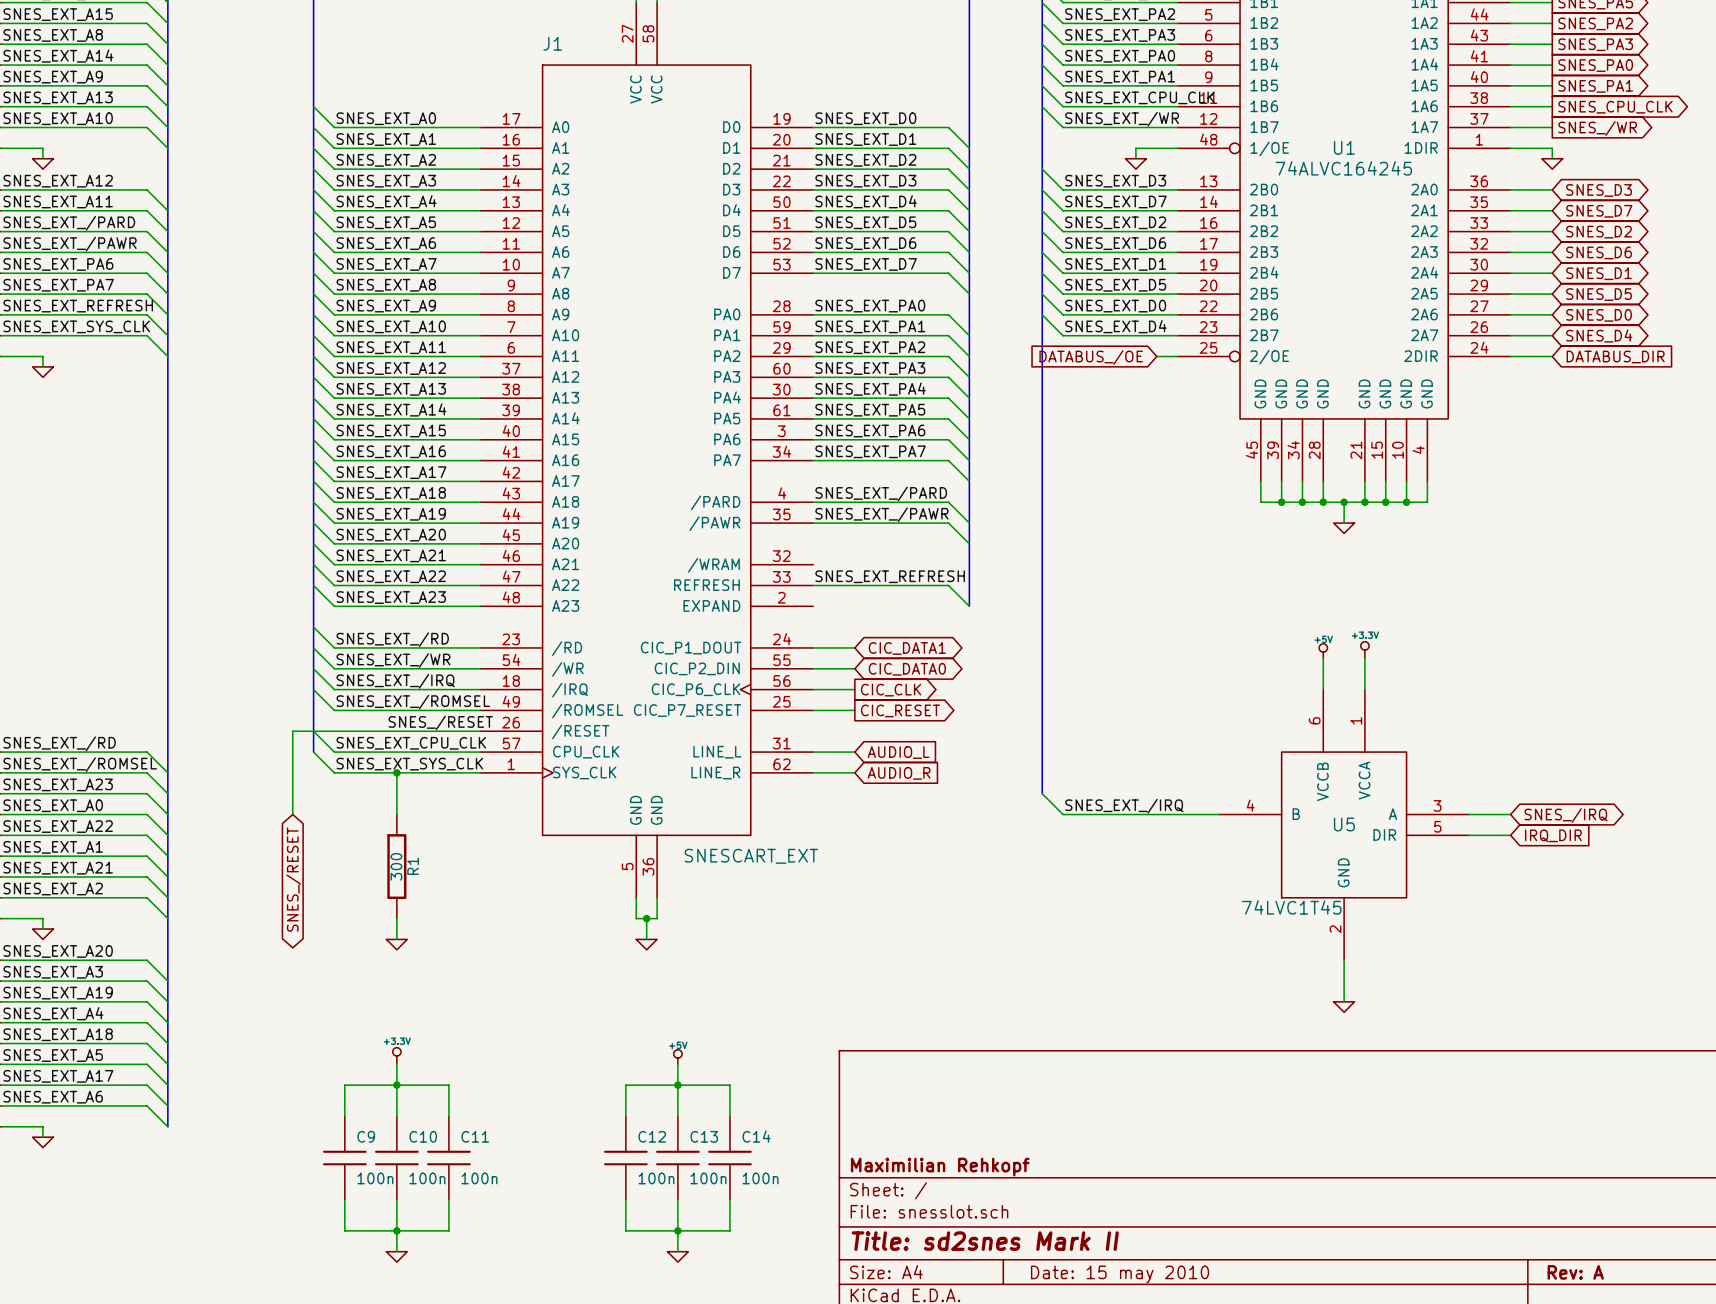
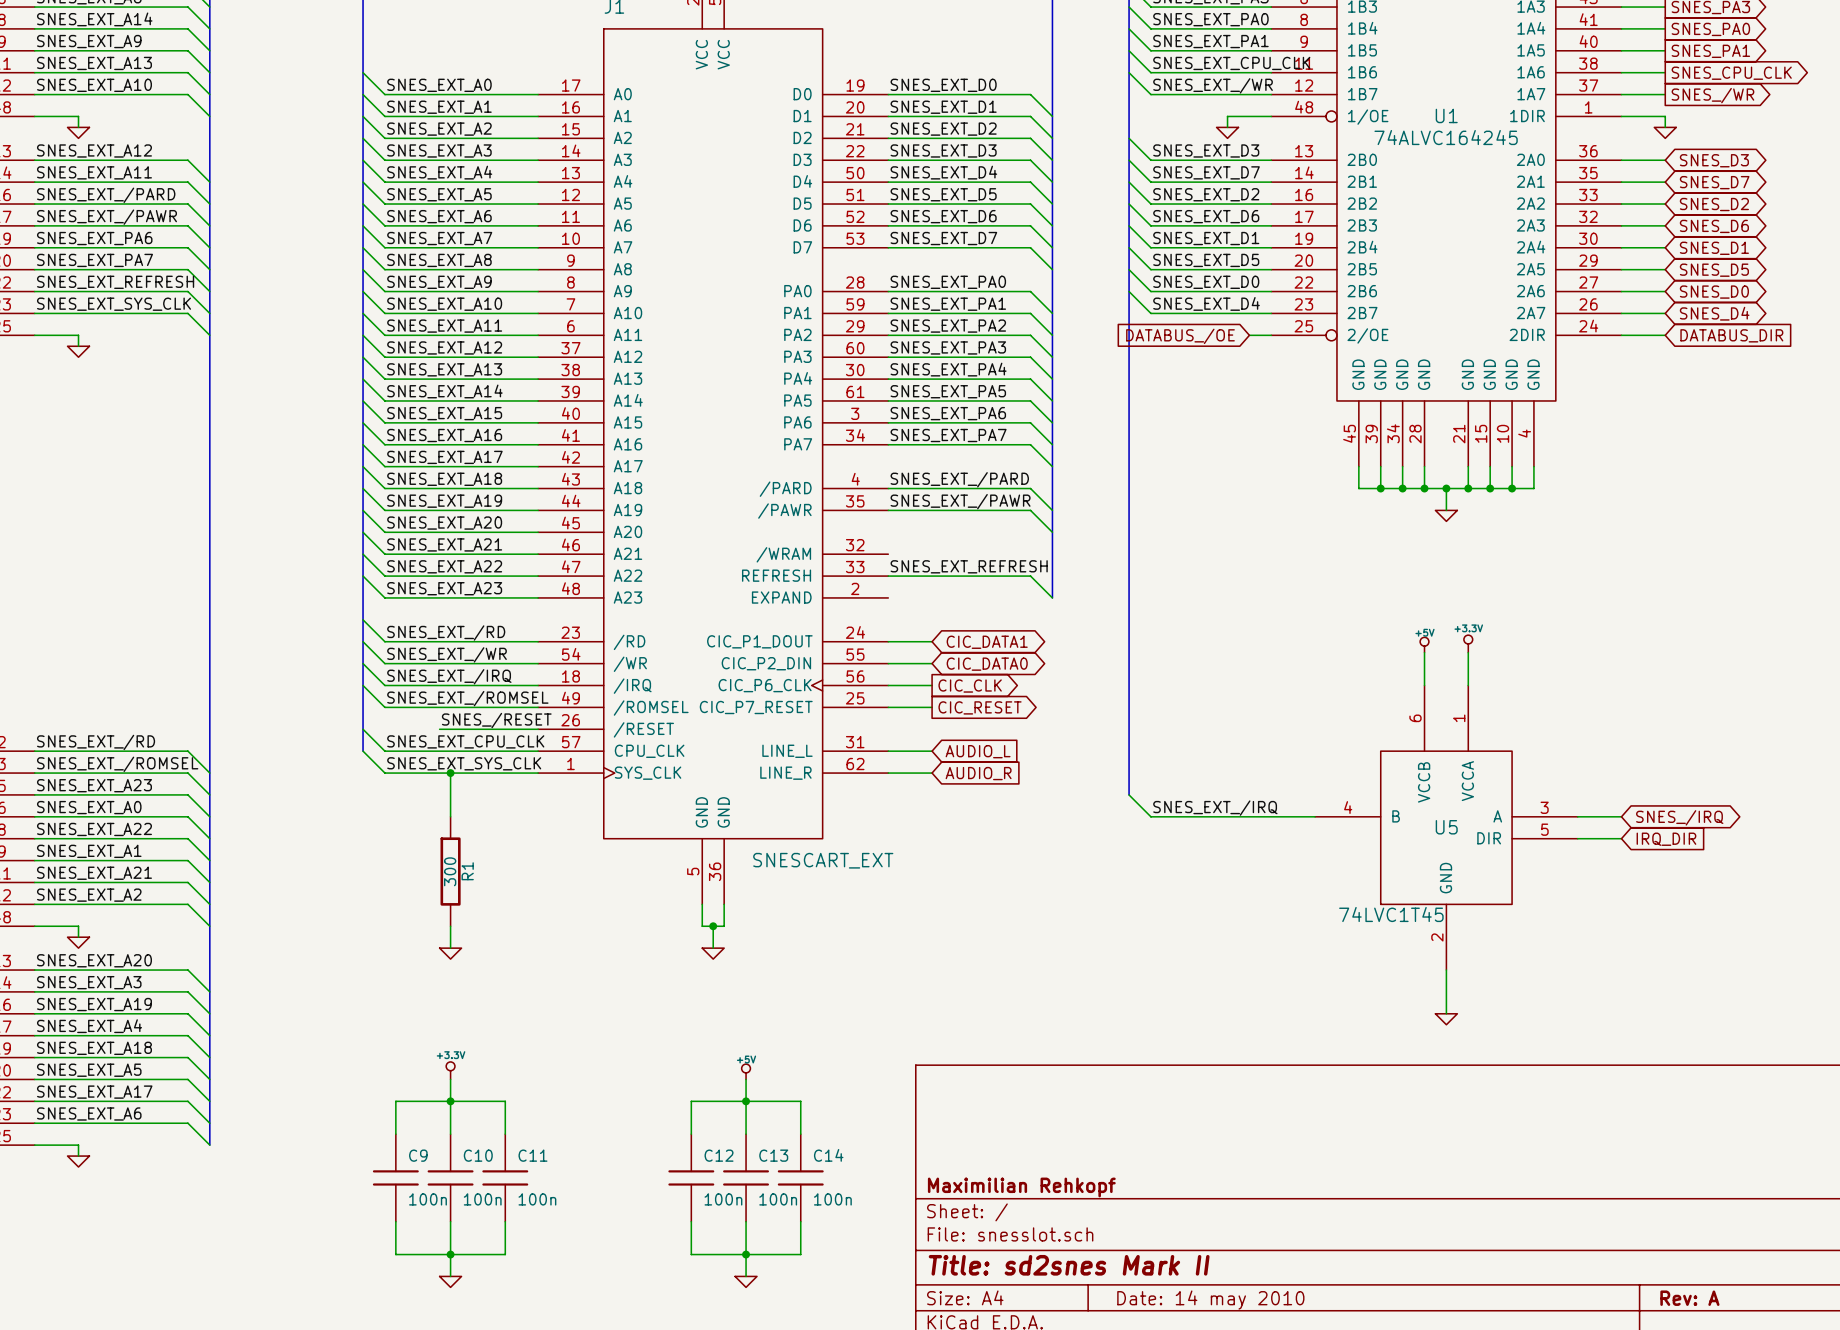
wire: (386, 731) (292, 731) (292, 814) -> none
global label: SNES_/RESET (293, 879) -> none
title block: Date: 15 may 2010 (1120, 1274) -> Date: 14 may 2010 (1210, 1300)

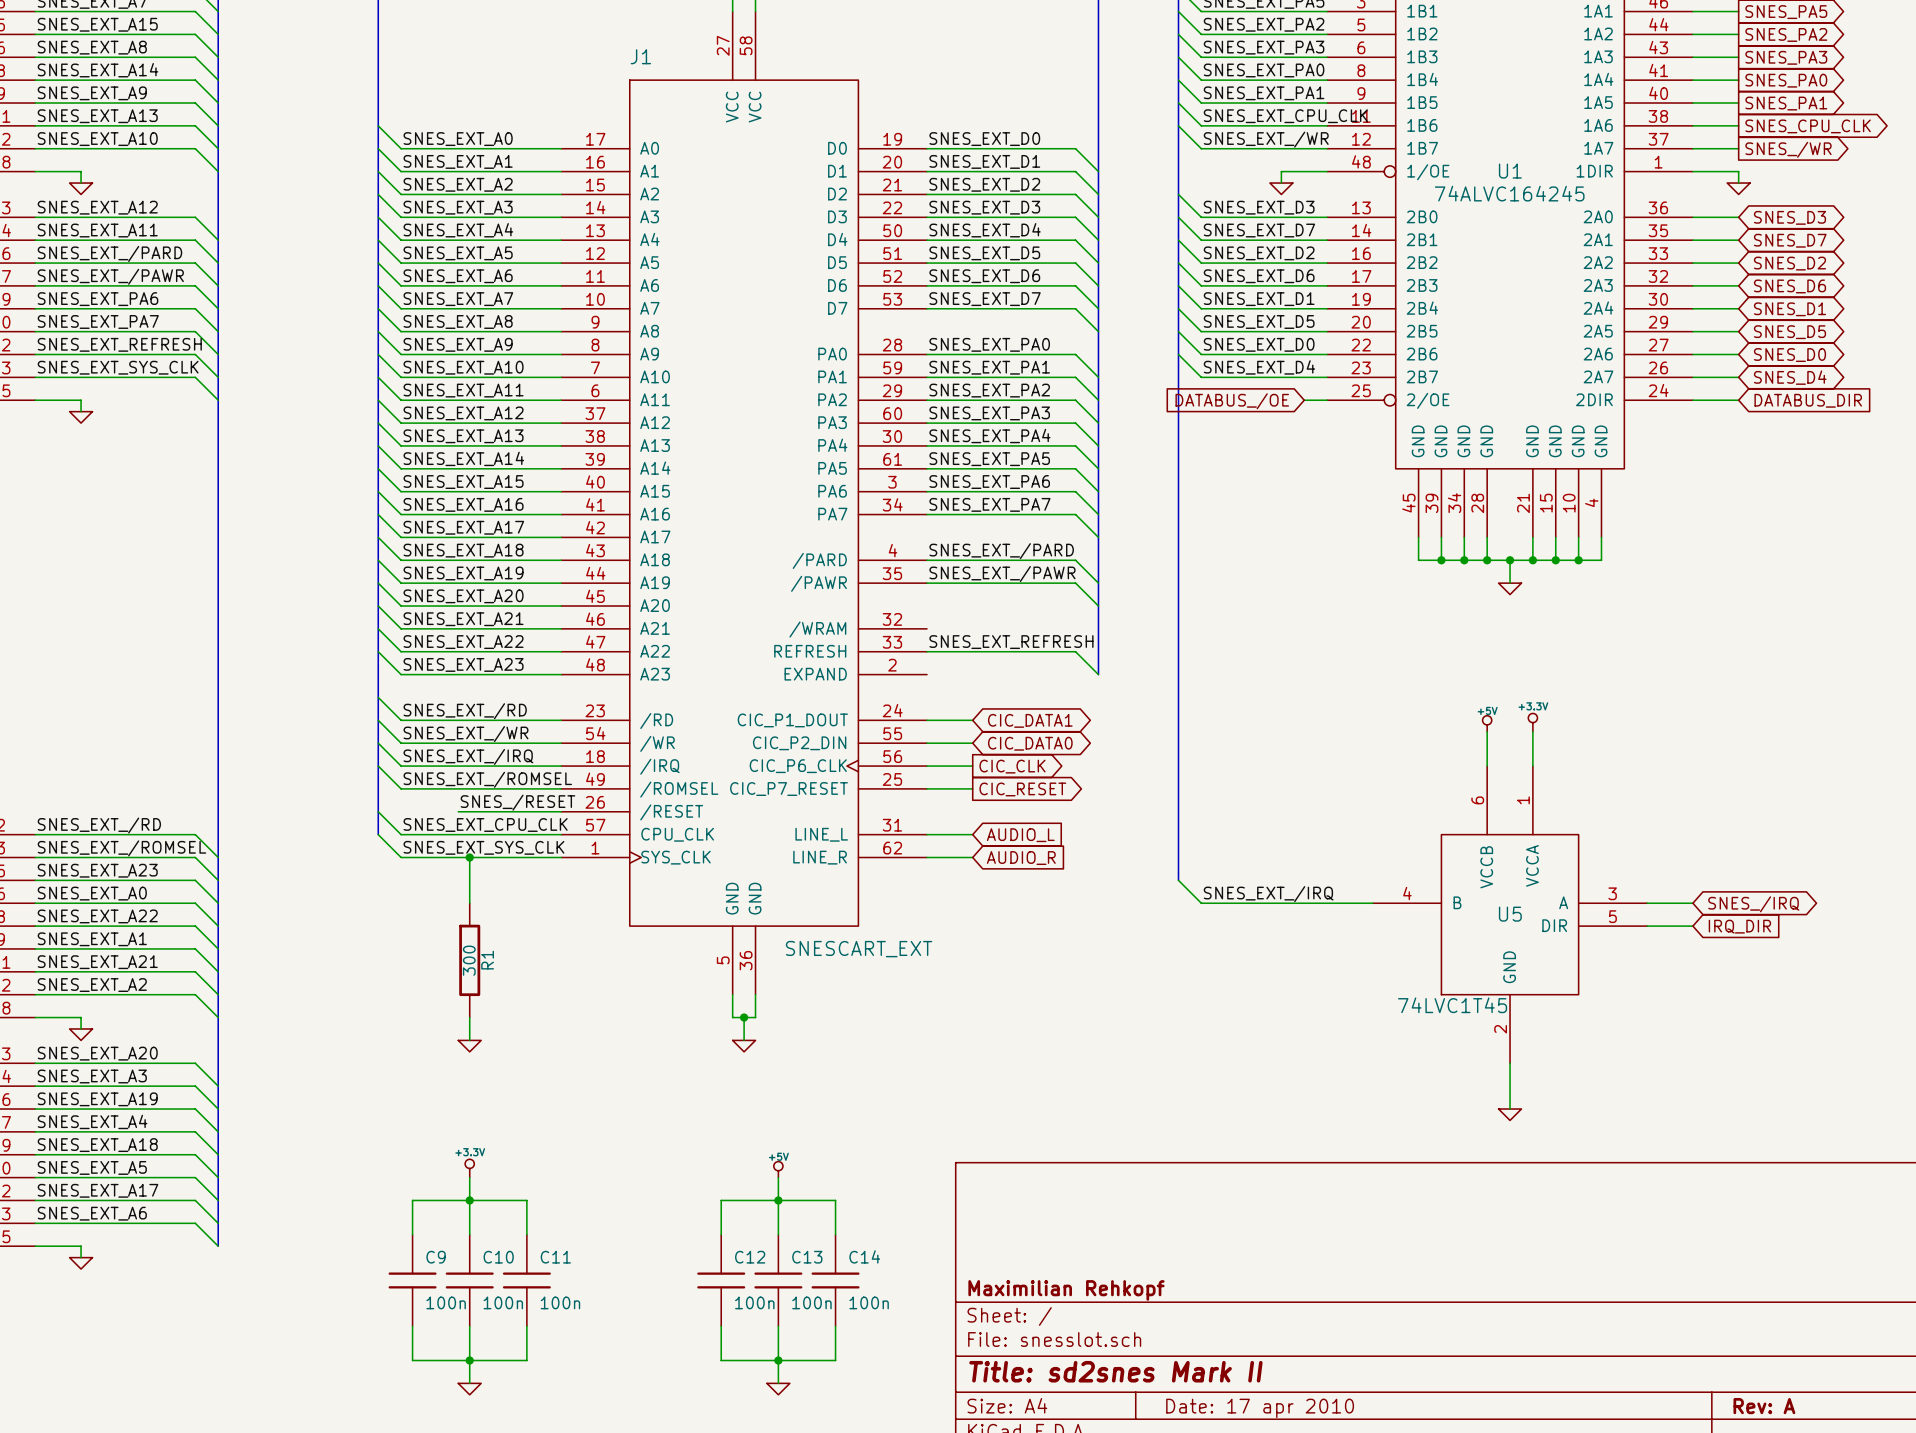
title block: Date: 14 may 2010 (1210, 1300) -> Date: 17 apr 2010 (1260, 1408)

